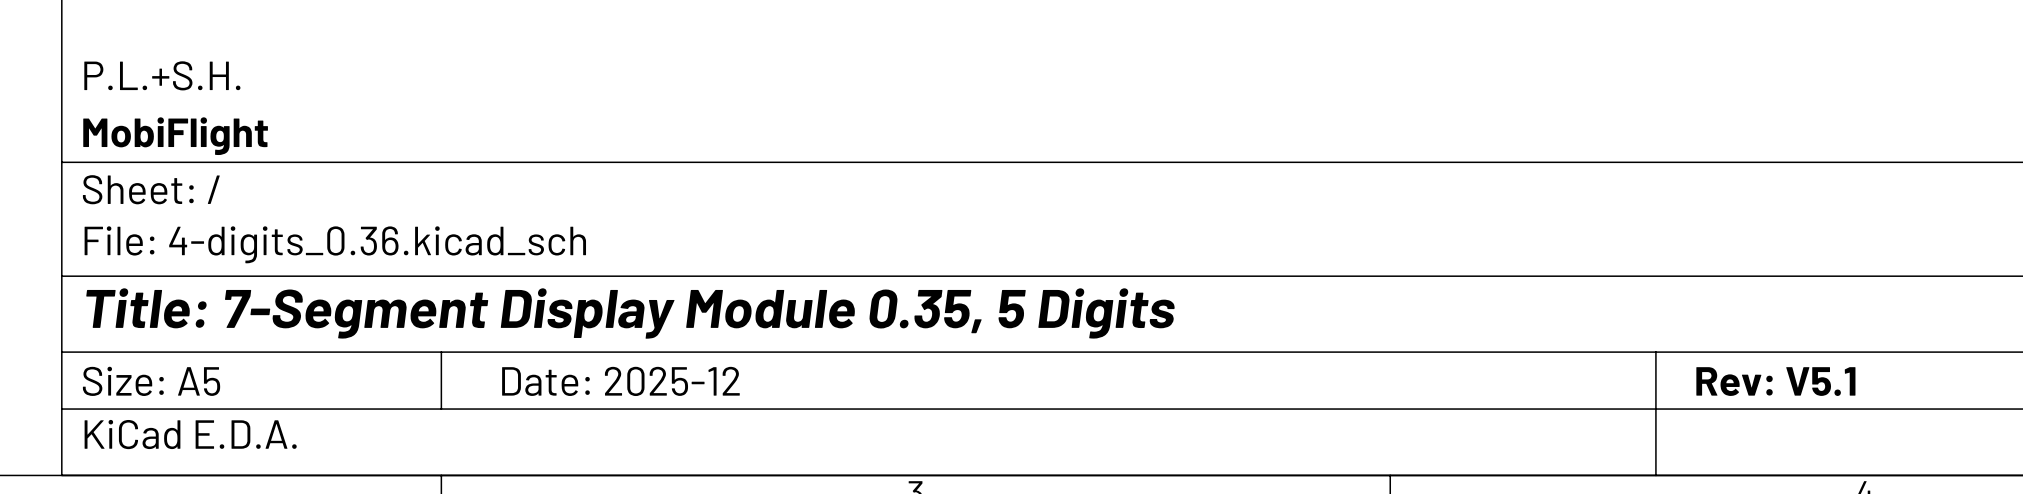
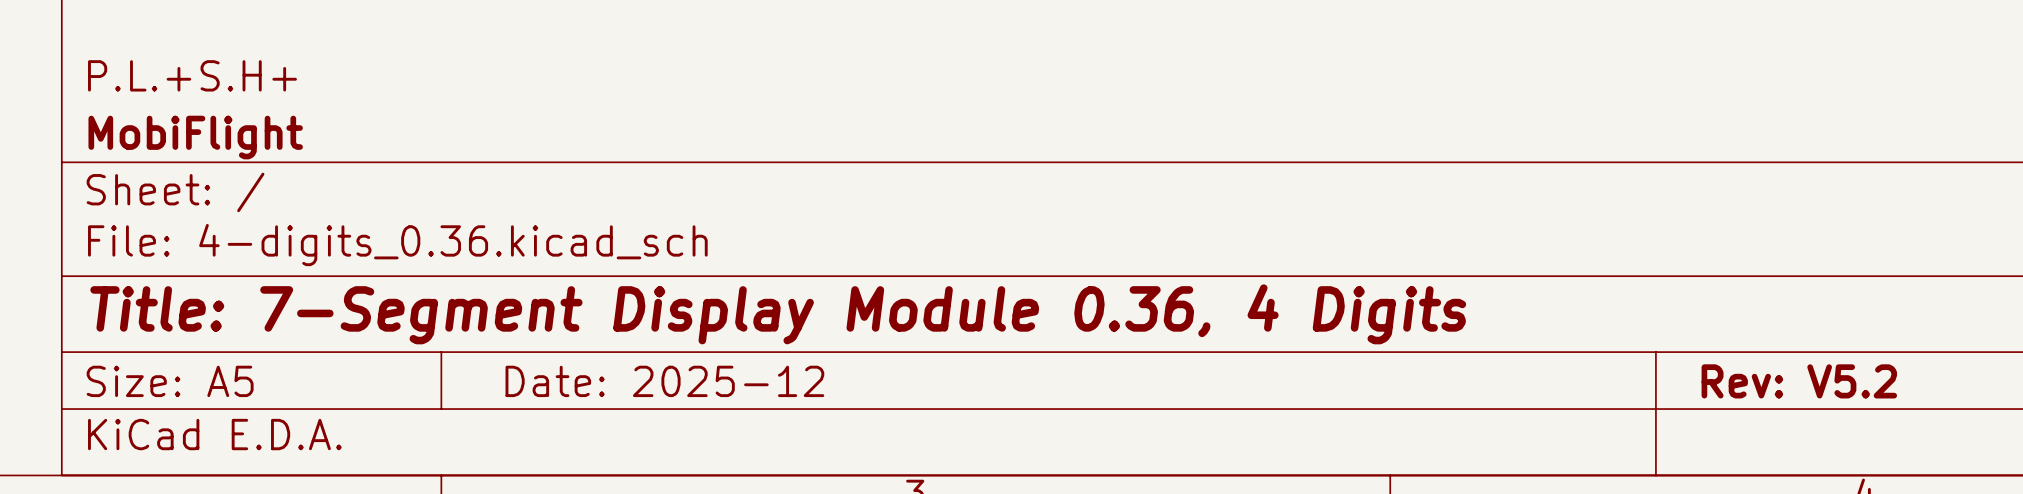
title block: P.L.+S.H. (162, 75) -> P.L.+S.H+ (192, 75)
title block: Title: 7-Segment Display Module 0.35, 5 Digits (630, 313) -> Title: 7-Segment Display Module 0.36, 4 Digits (778, 314)
title block: Rev: V5.1 (1775, 381) -> Rev: V5.2 (1799, 381)

